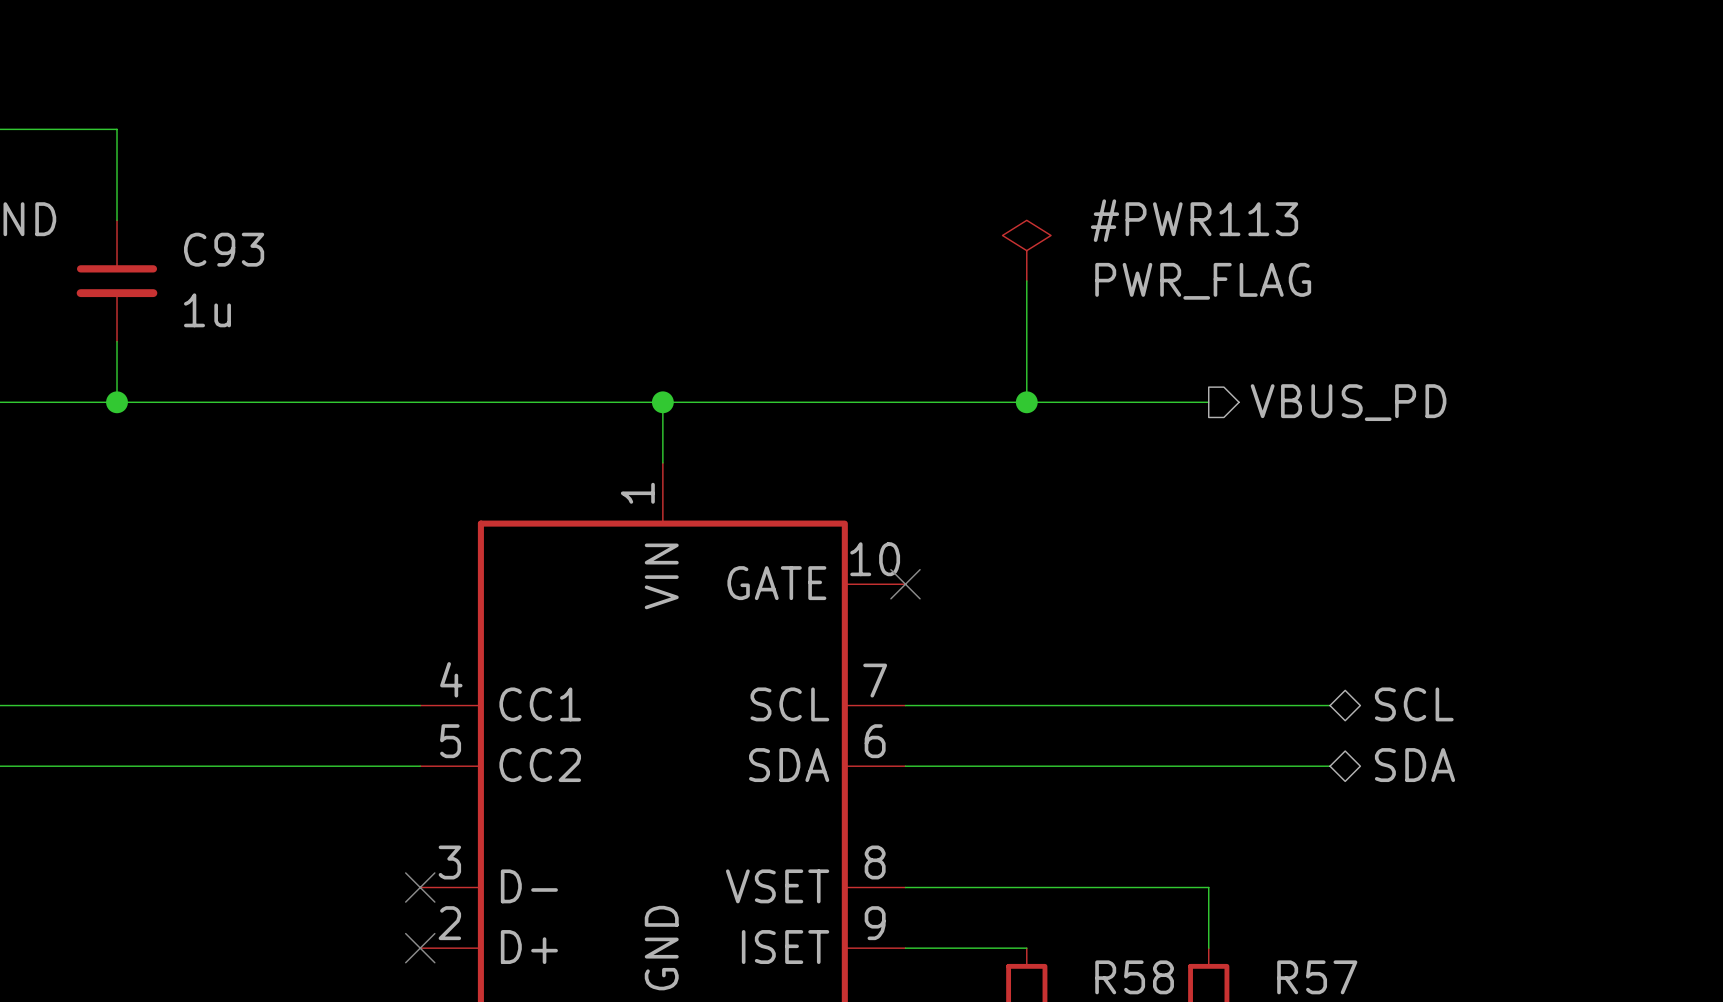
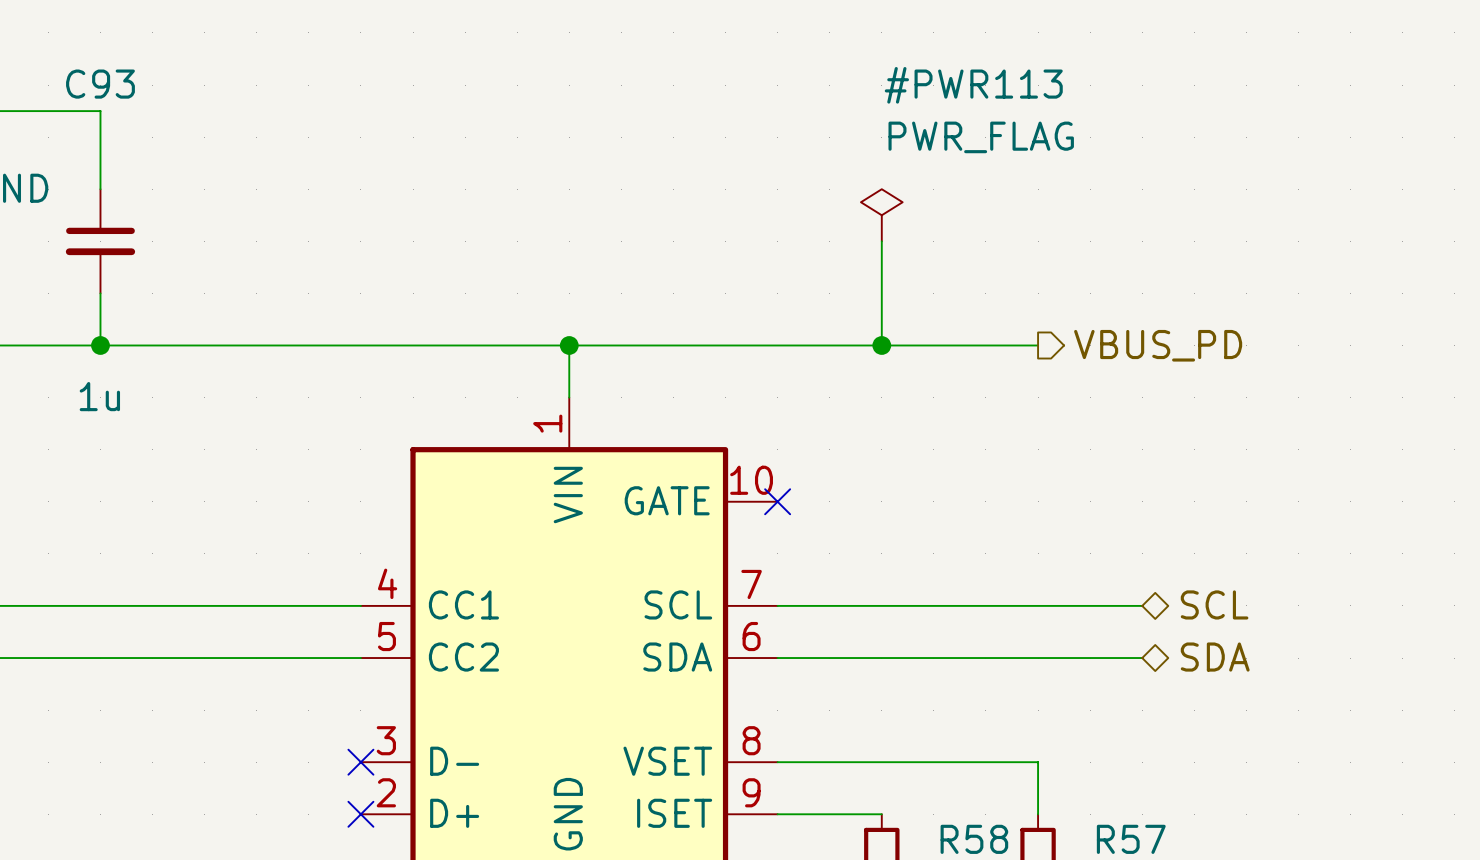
#PWR113 name position: #PWR113 (1194, 220) -> #PWR113 (973, 85)
C93 name position: C93 (224, 249) -> C93 (100, 84)
#PWR113 text position: PWR_FLAG (1203, 281) -> PWR_FLAG (981, 137)
C93 value position: 1u (207, 310) -> 1u (99, 396)

